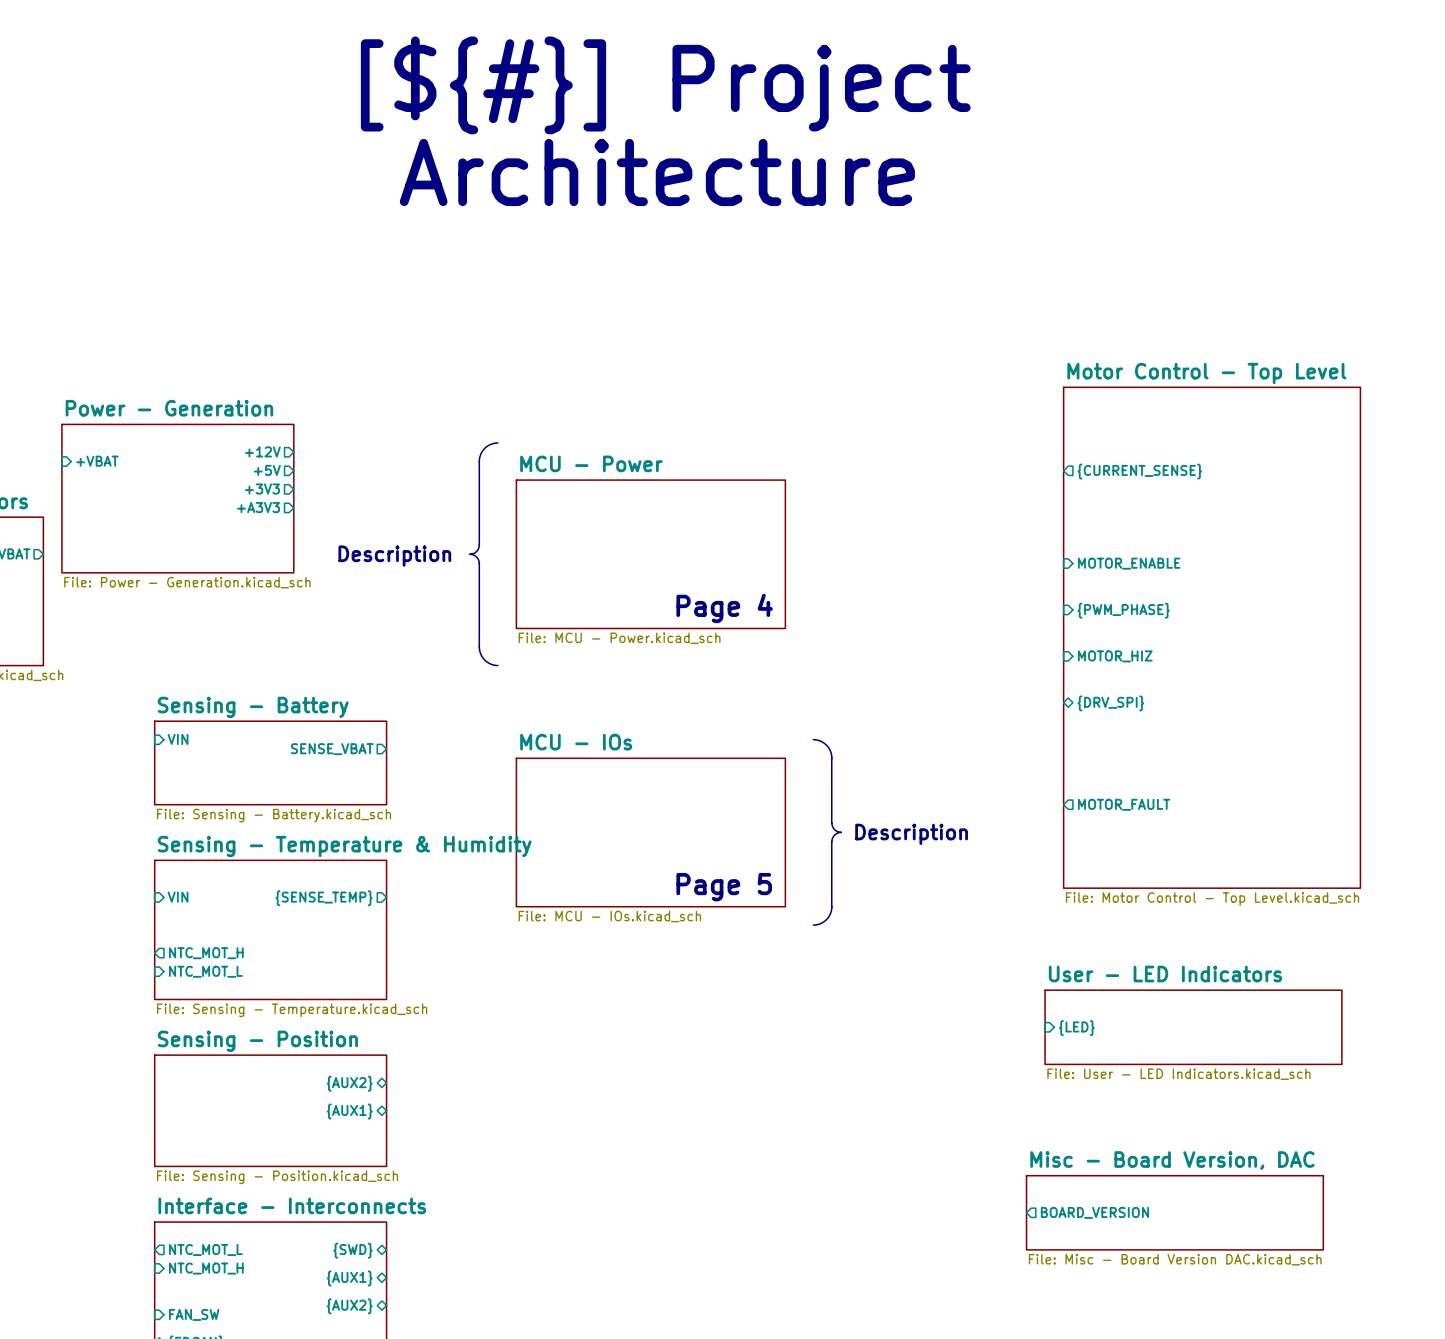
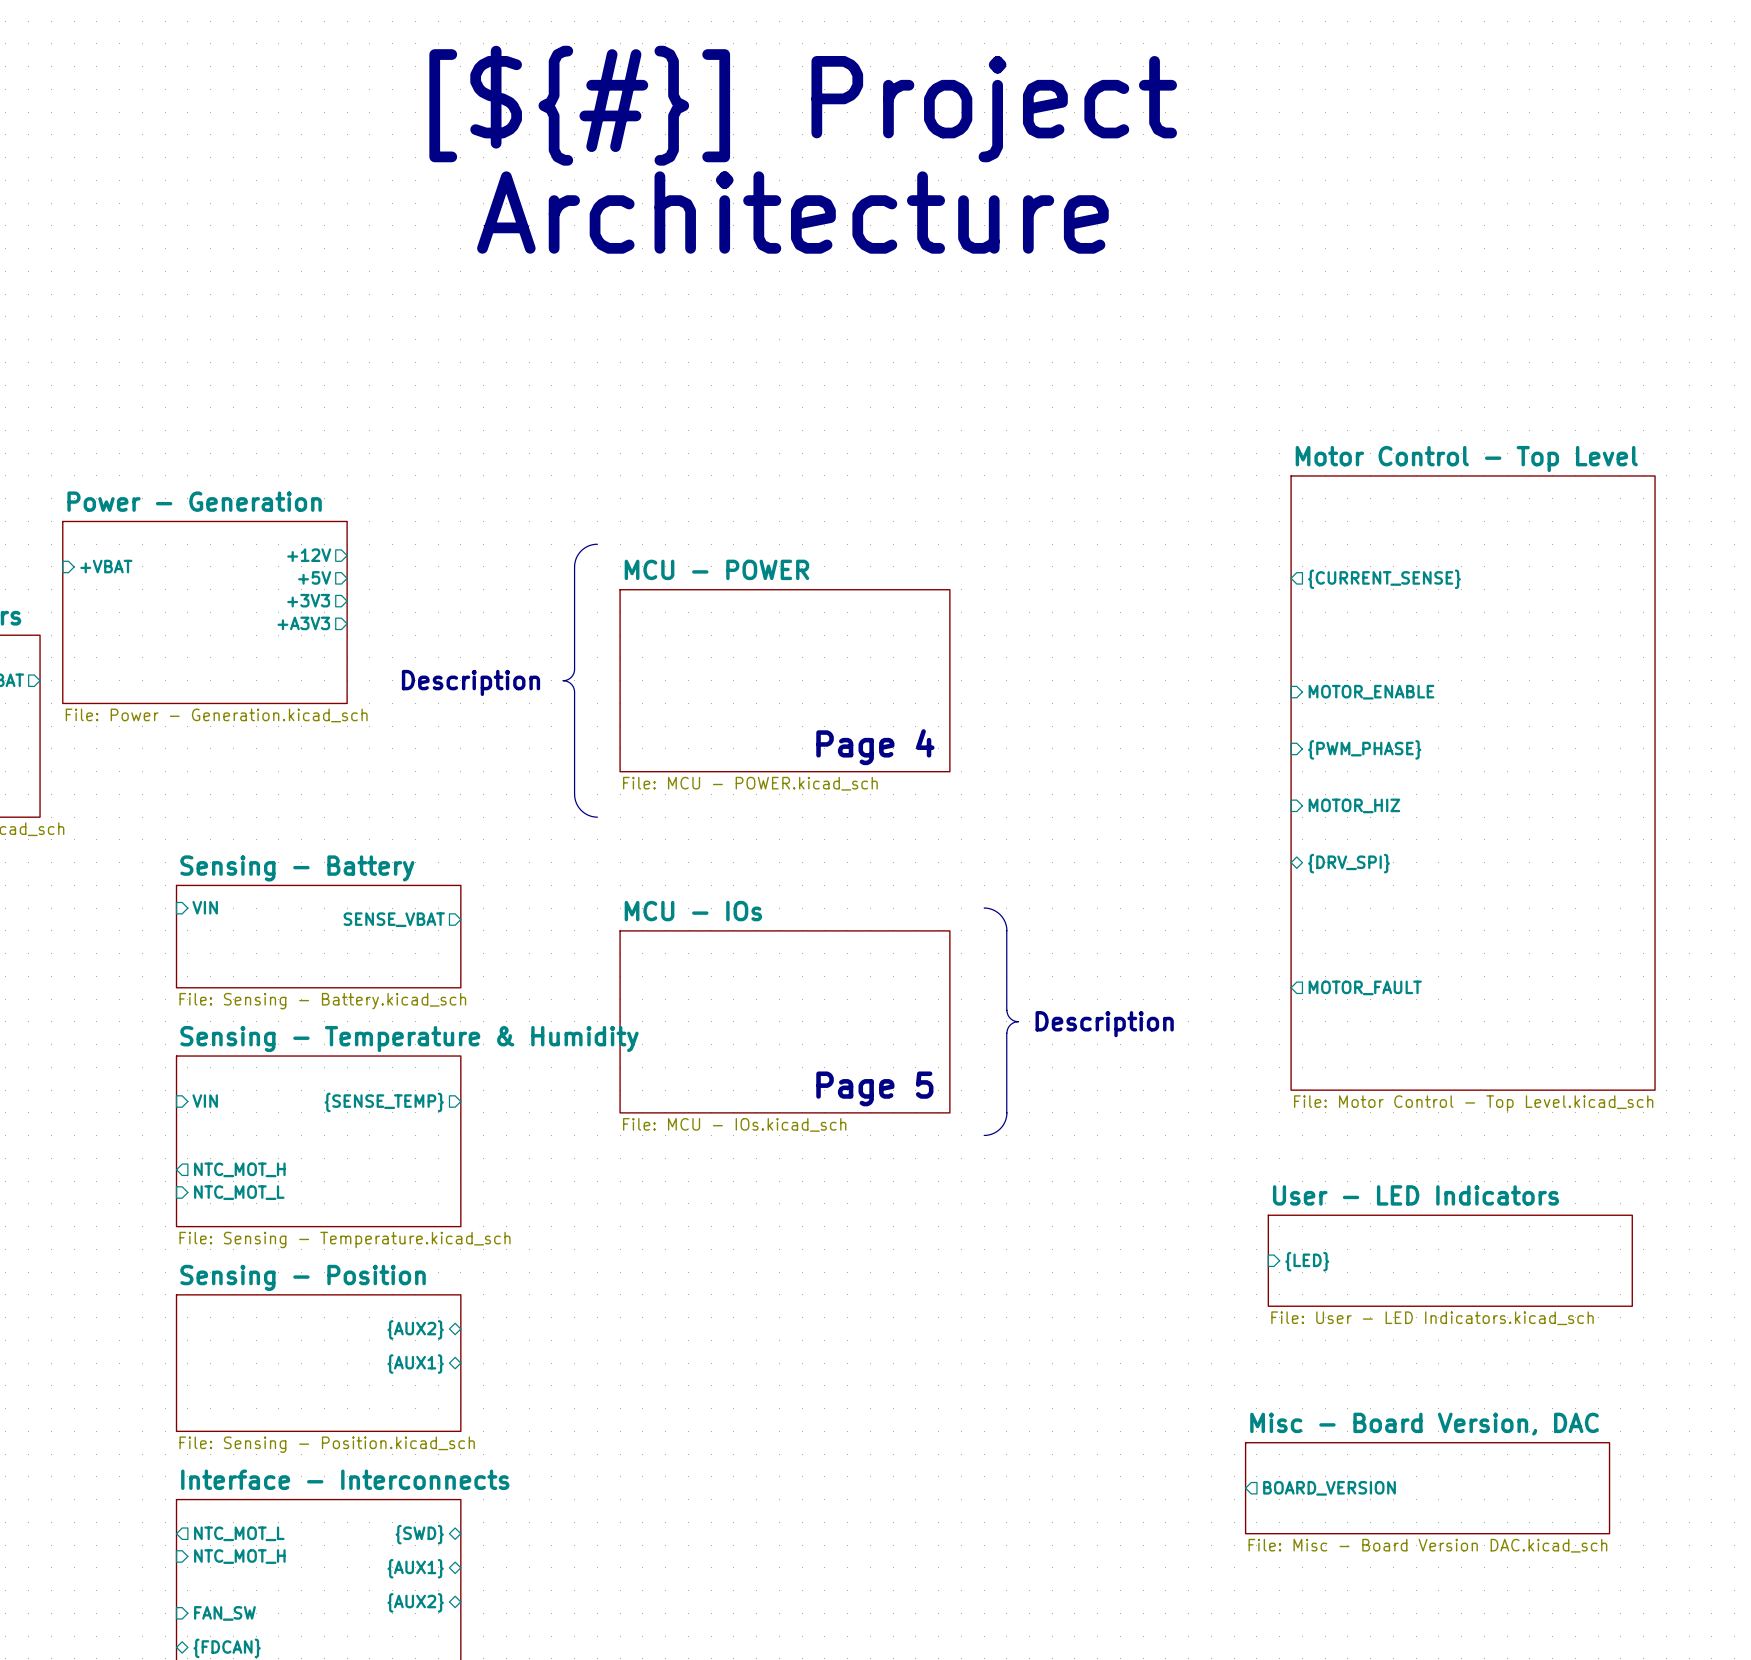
sheet MCU - Power name: MCU - Power (591, 463) -> MCU - POWER (716, 569)
sheet MCU - Power value: File: MCU - Power.kicad_sch (619, 638) -> File: MCU - POWER.kicad_sch (750, 783)

